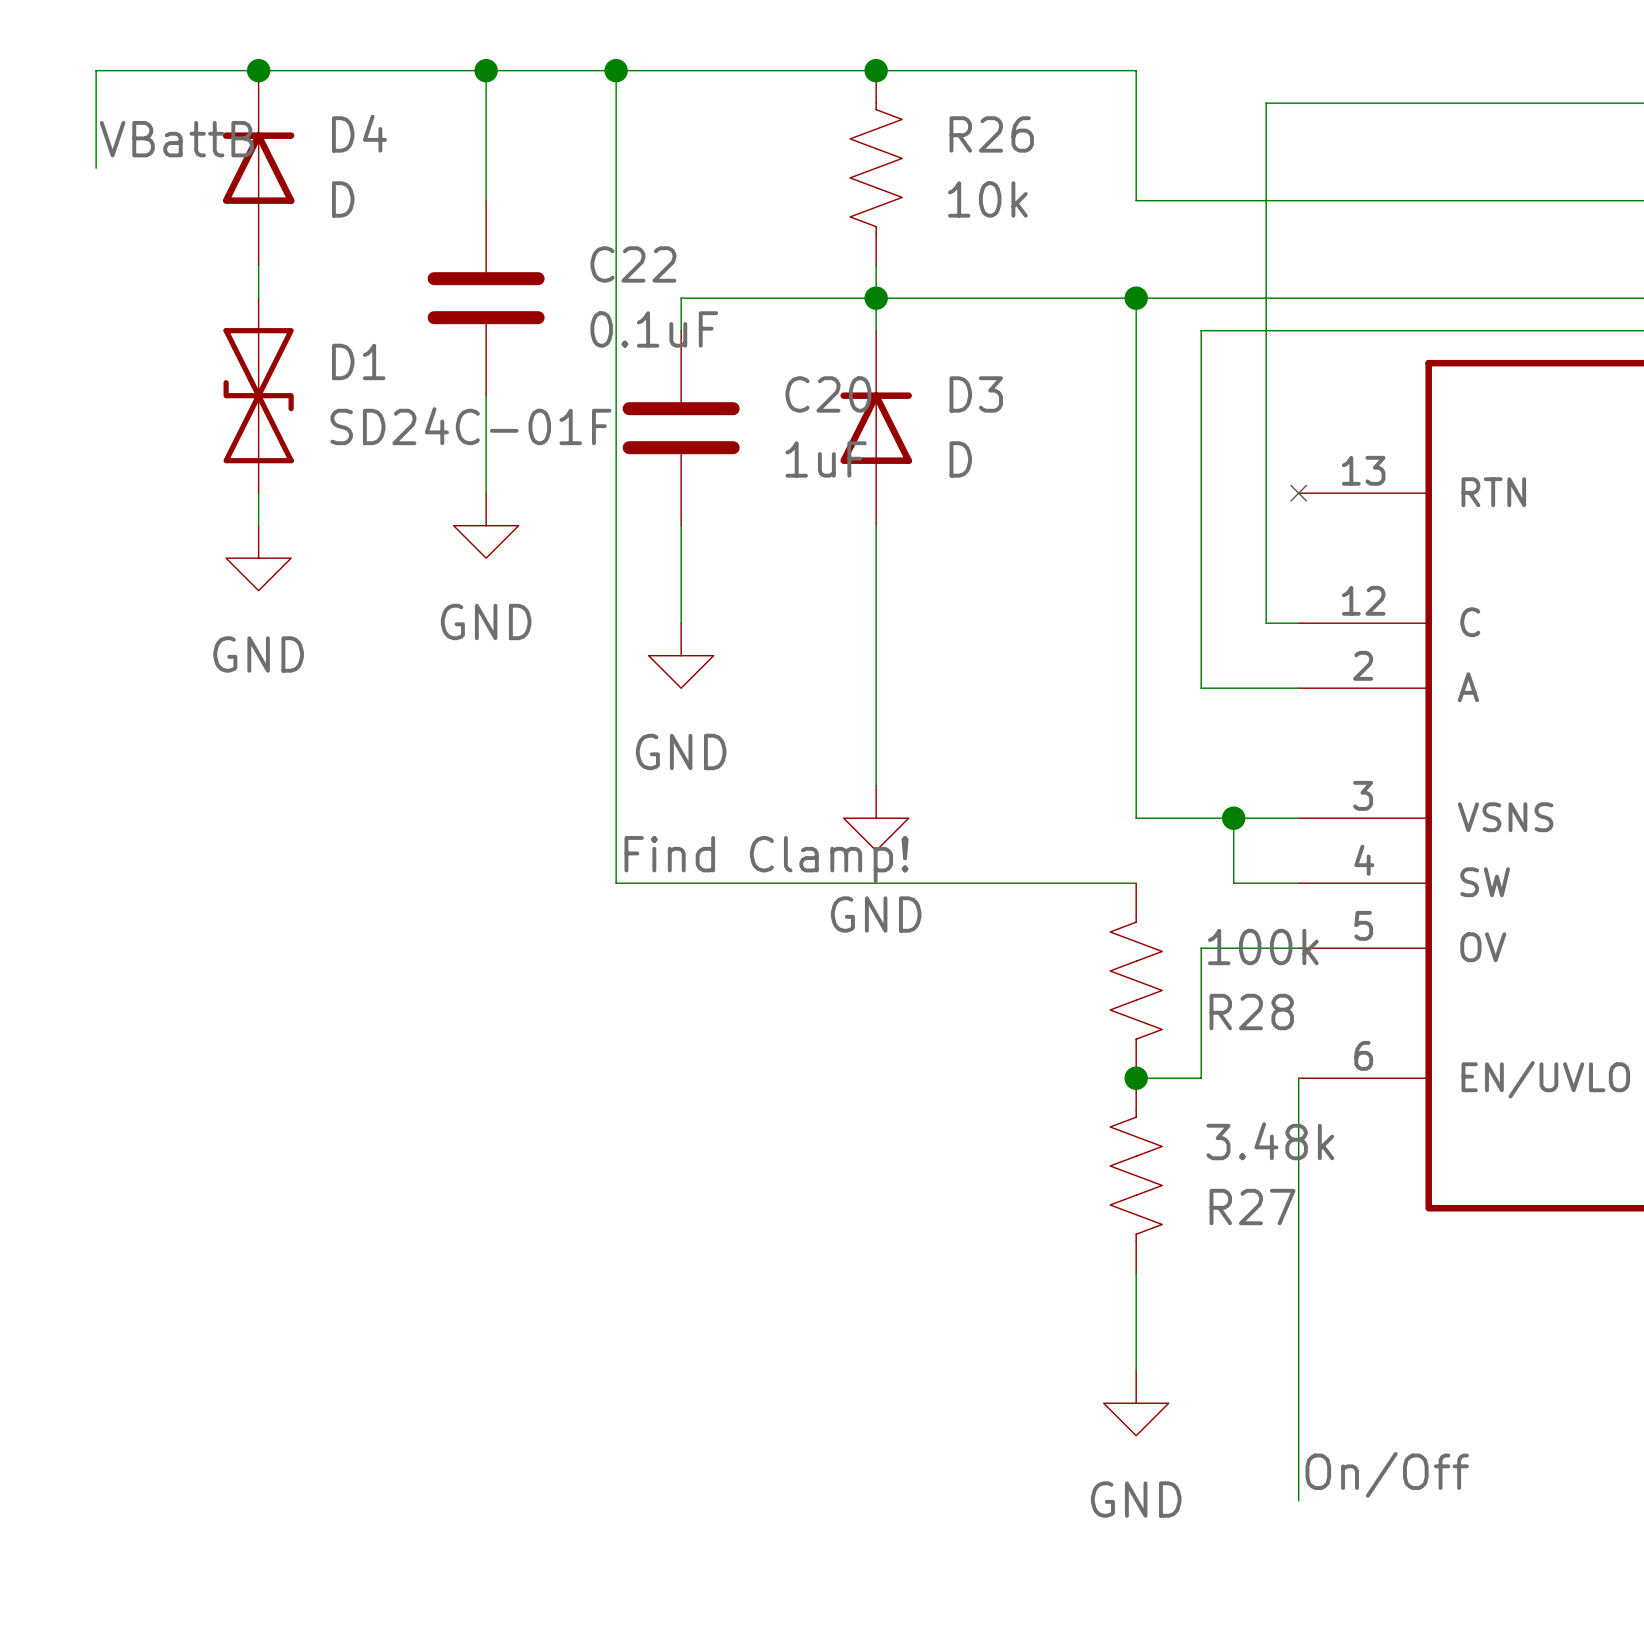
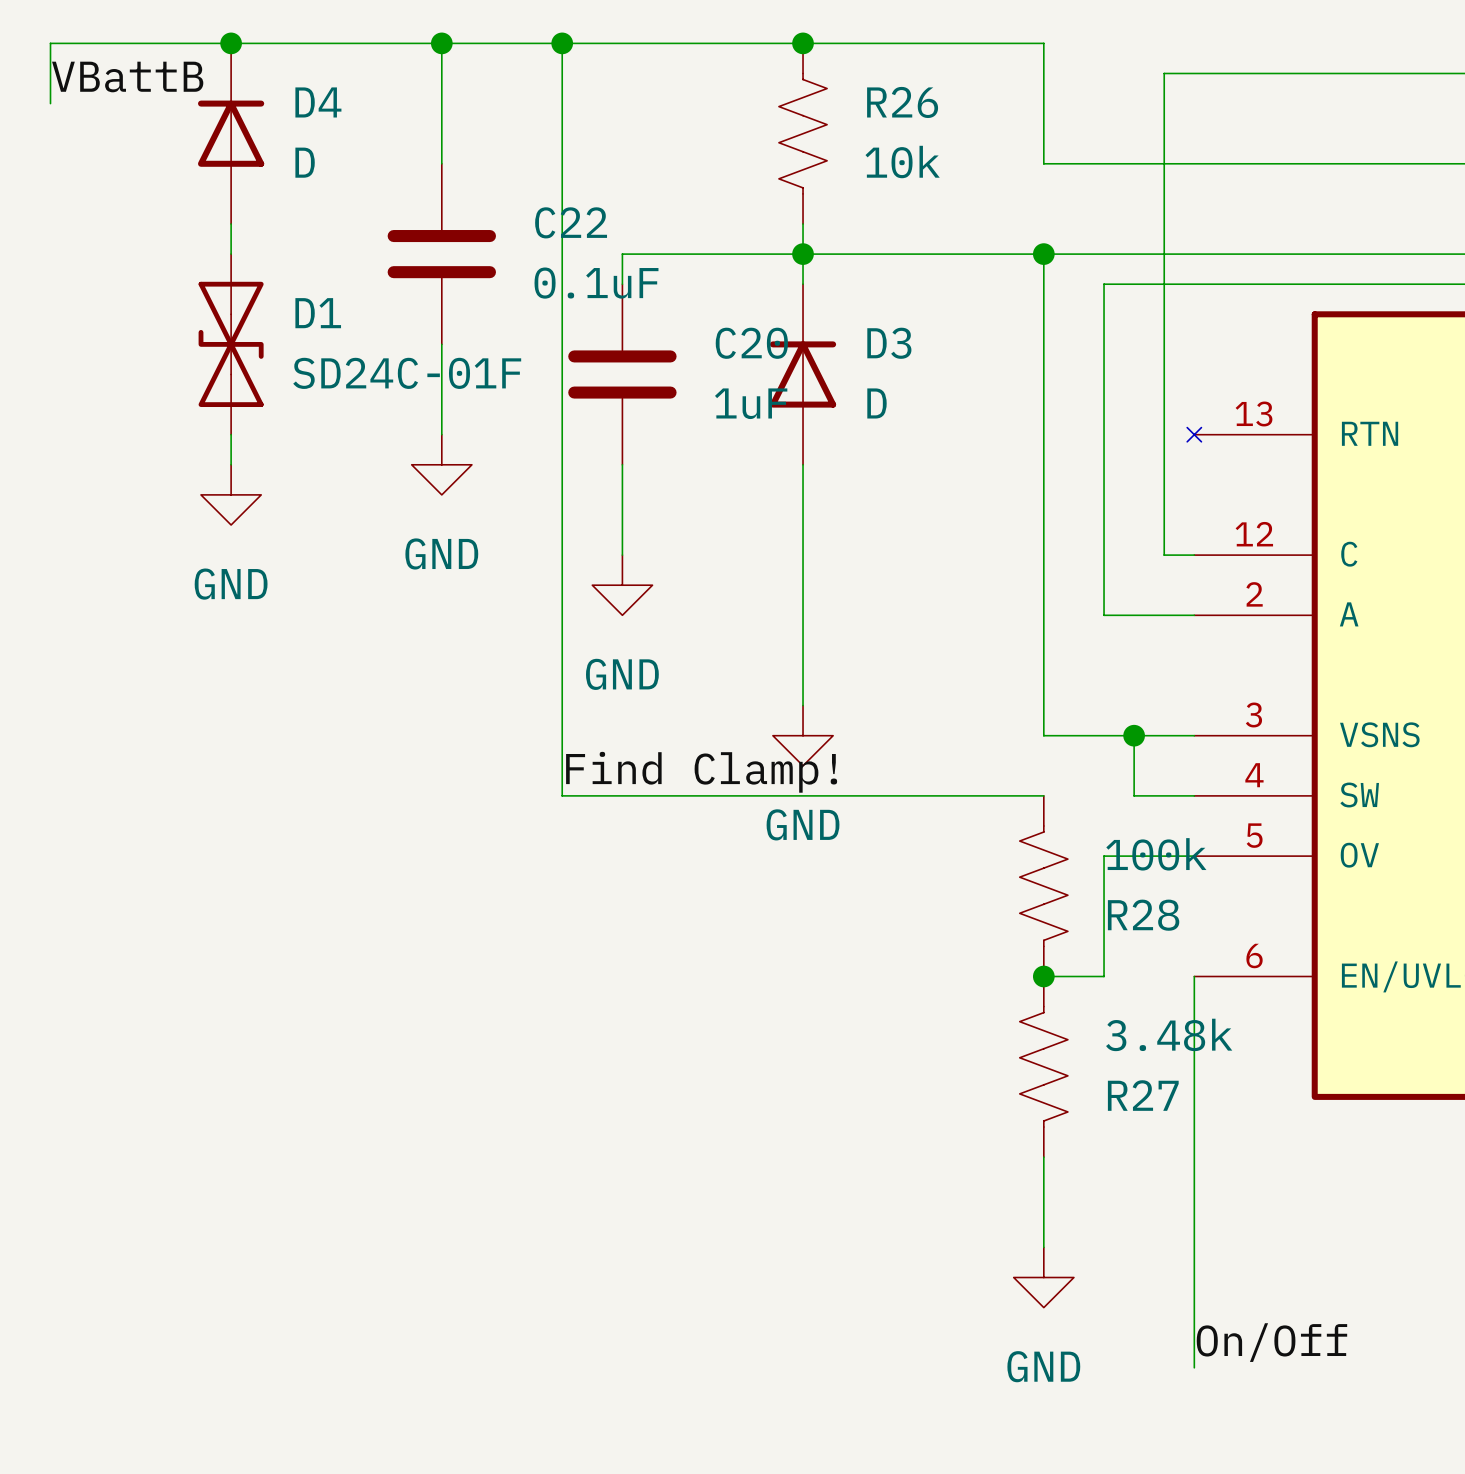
wire: (96, 70) (96, 168) -> (80, 43) (50, 43) (50, 103)
label position: VBattB (176, 139) -> VBattB (127, 76)

